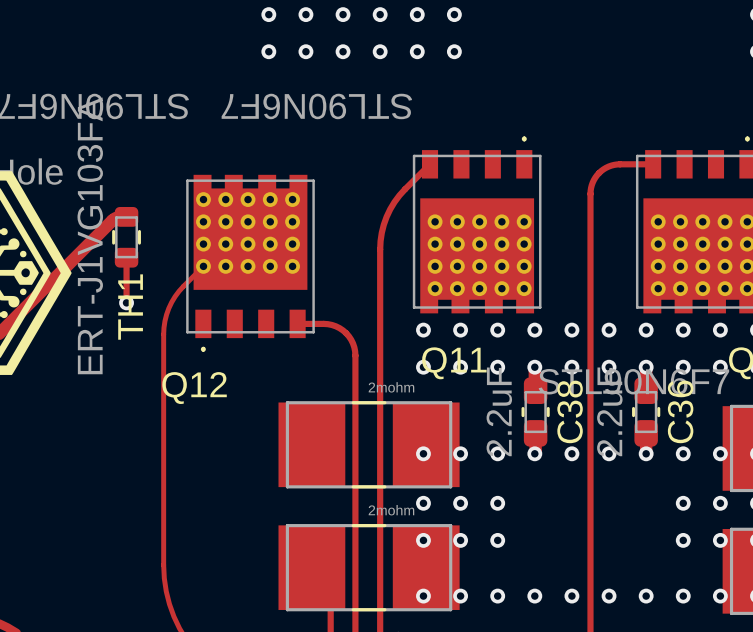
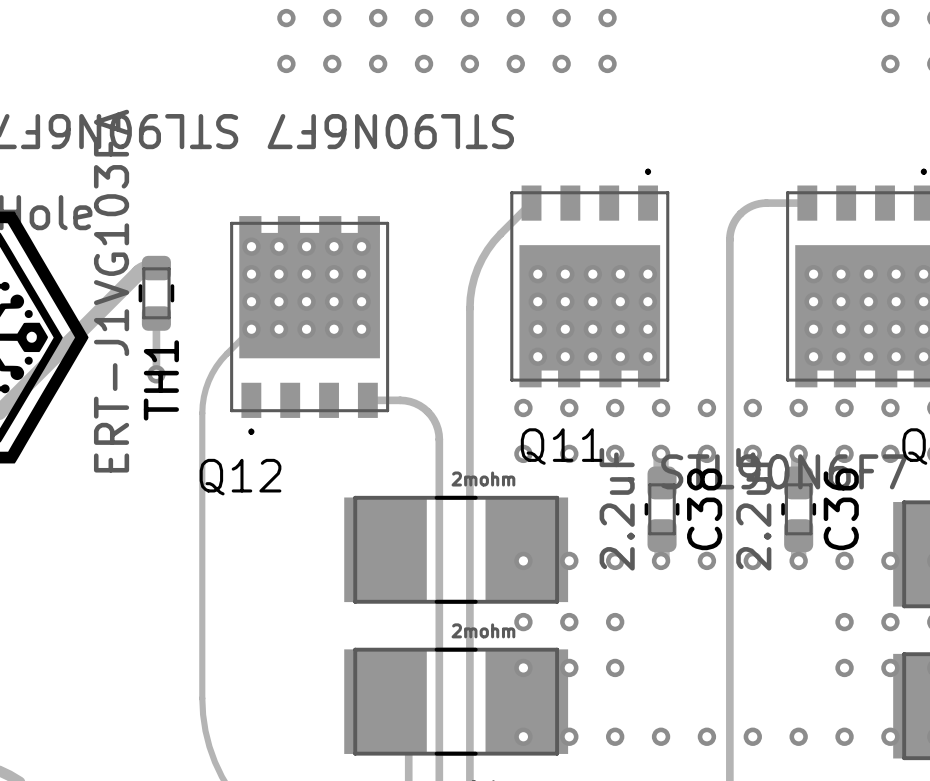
via: none -> (286, 18)
via: none -> (607, 18)
via: none -> (890, 18)
via: none -> (286, 63)
via: none -> (607, 63)
via: none -> (890, 63)

